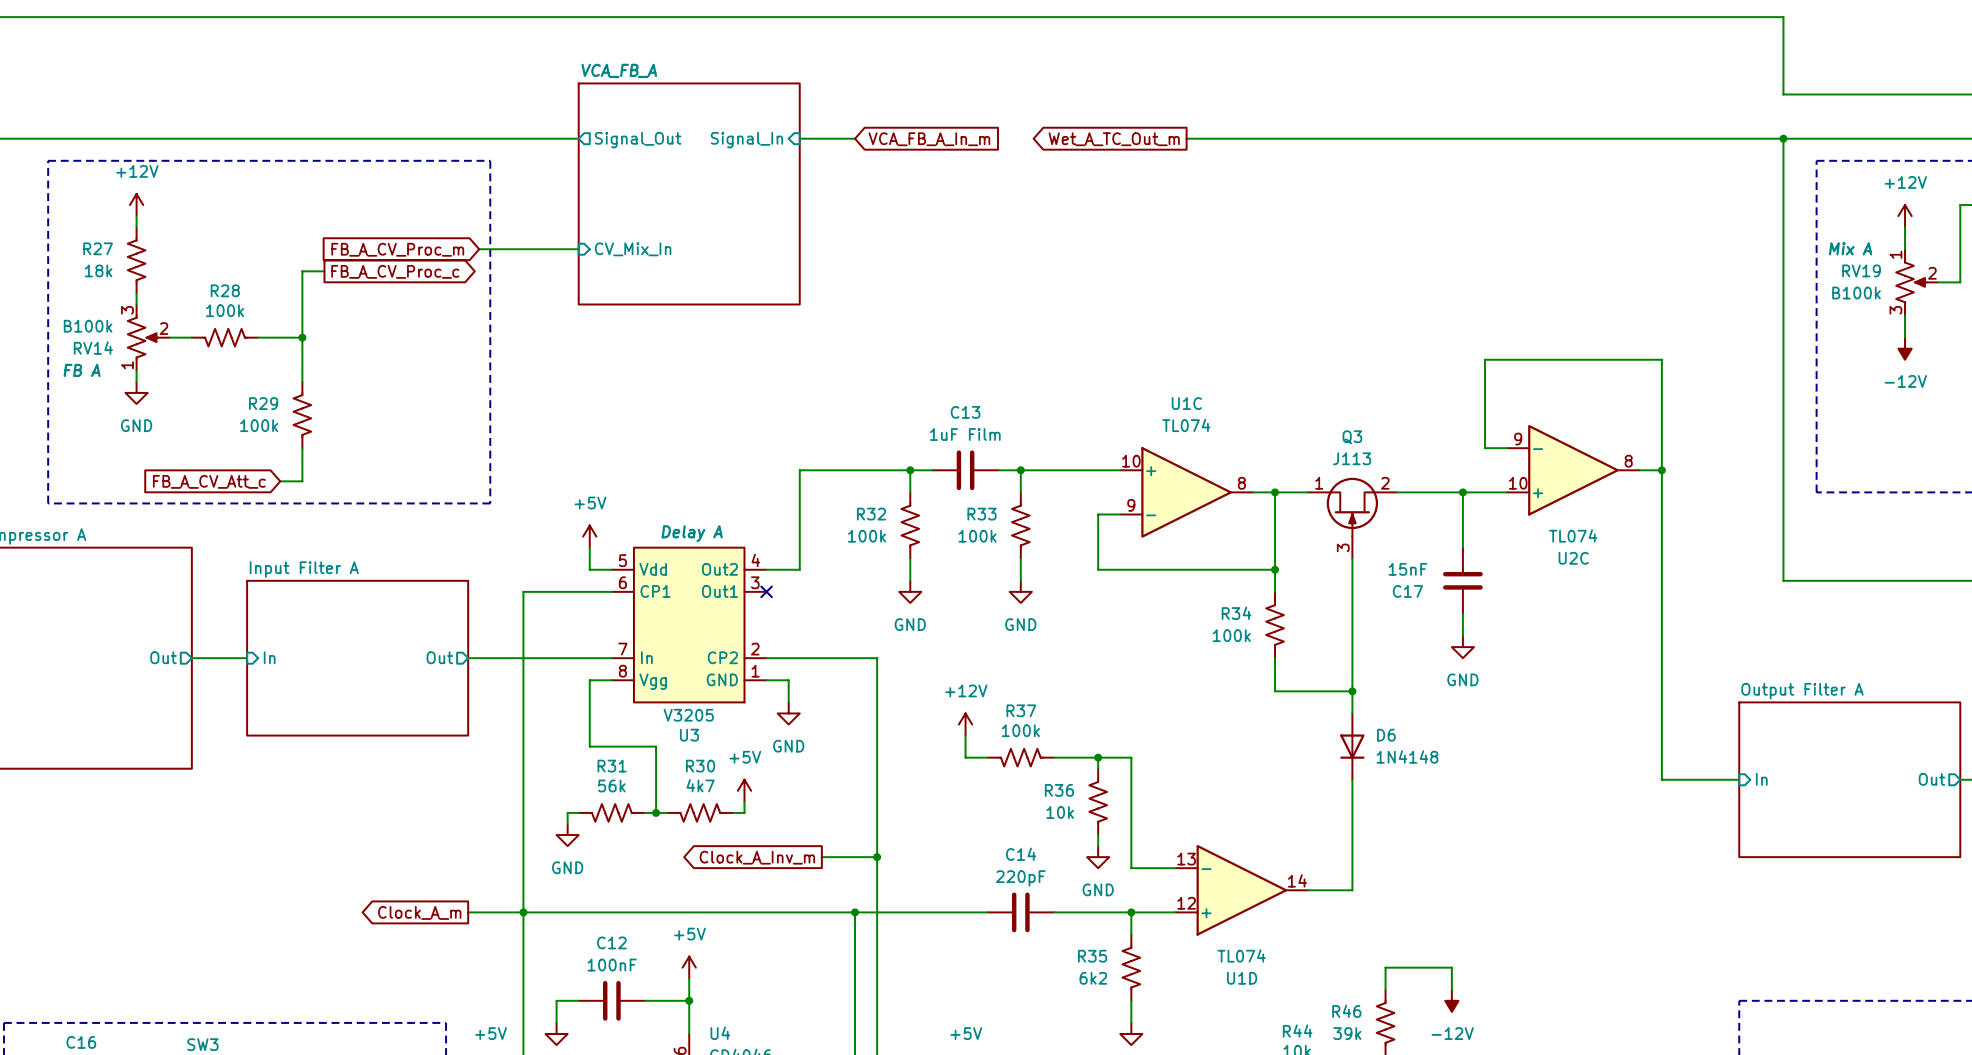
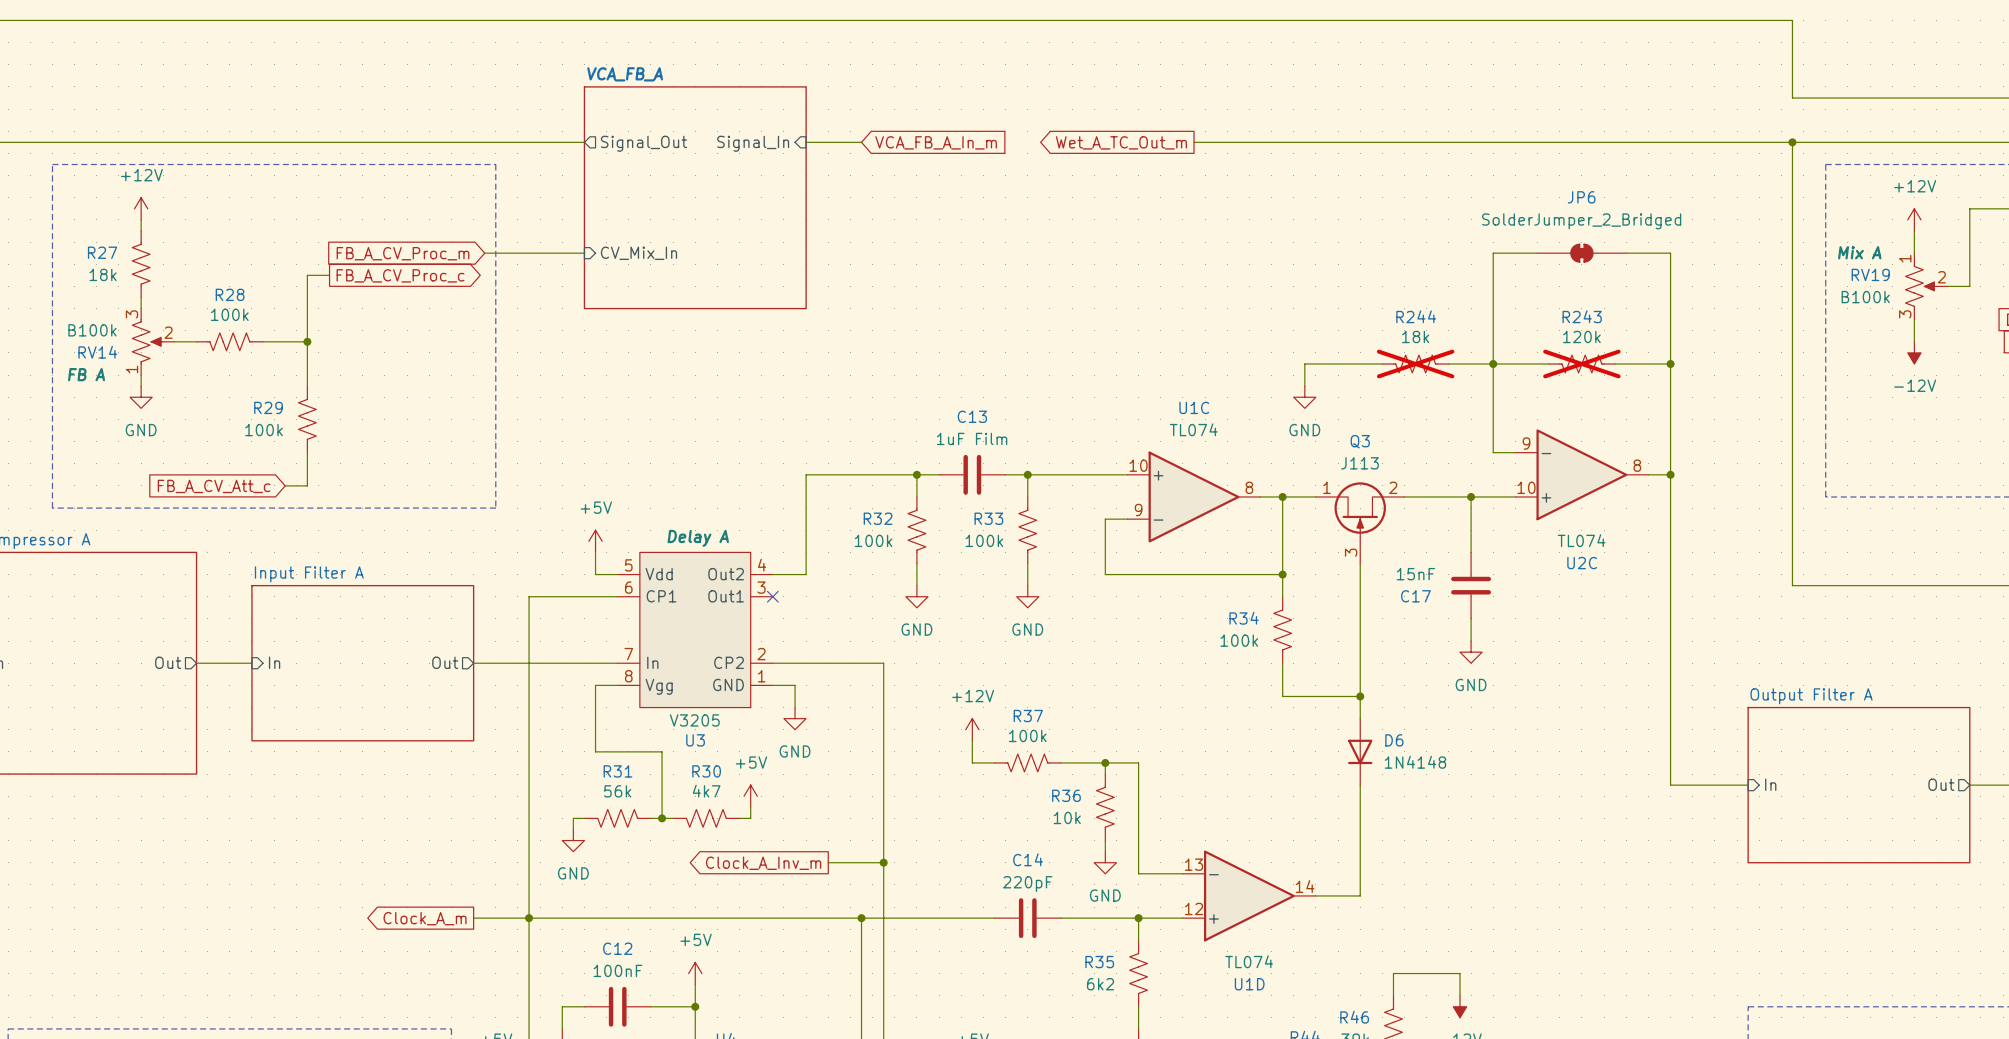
wire: none -> (1537, 253) (1493, 253) (1493, 363) (1448, 363)
JP6: none -> SolderJumper_2_Bridged (1581, 253)
wire: none -> (1626, 253) (1670, 253) (1670, 363)
wire: none -> (1382, 363) (1304, 363) (1304, 386)
R244: none -> 18k (1415, 363)
junction: none -> (1493, 363)
R243: none -> 120k (1581, 363)
junction: none -> (1670, 363)
power symbol: none -> GND (1304, 397)

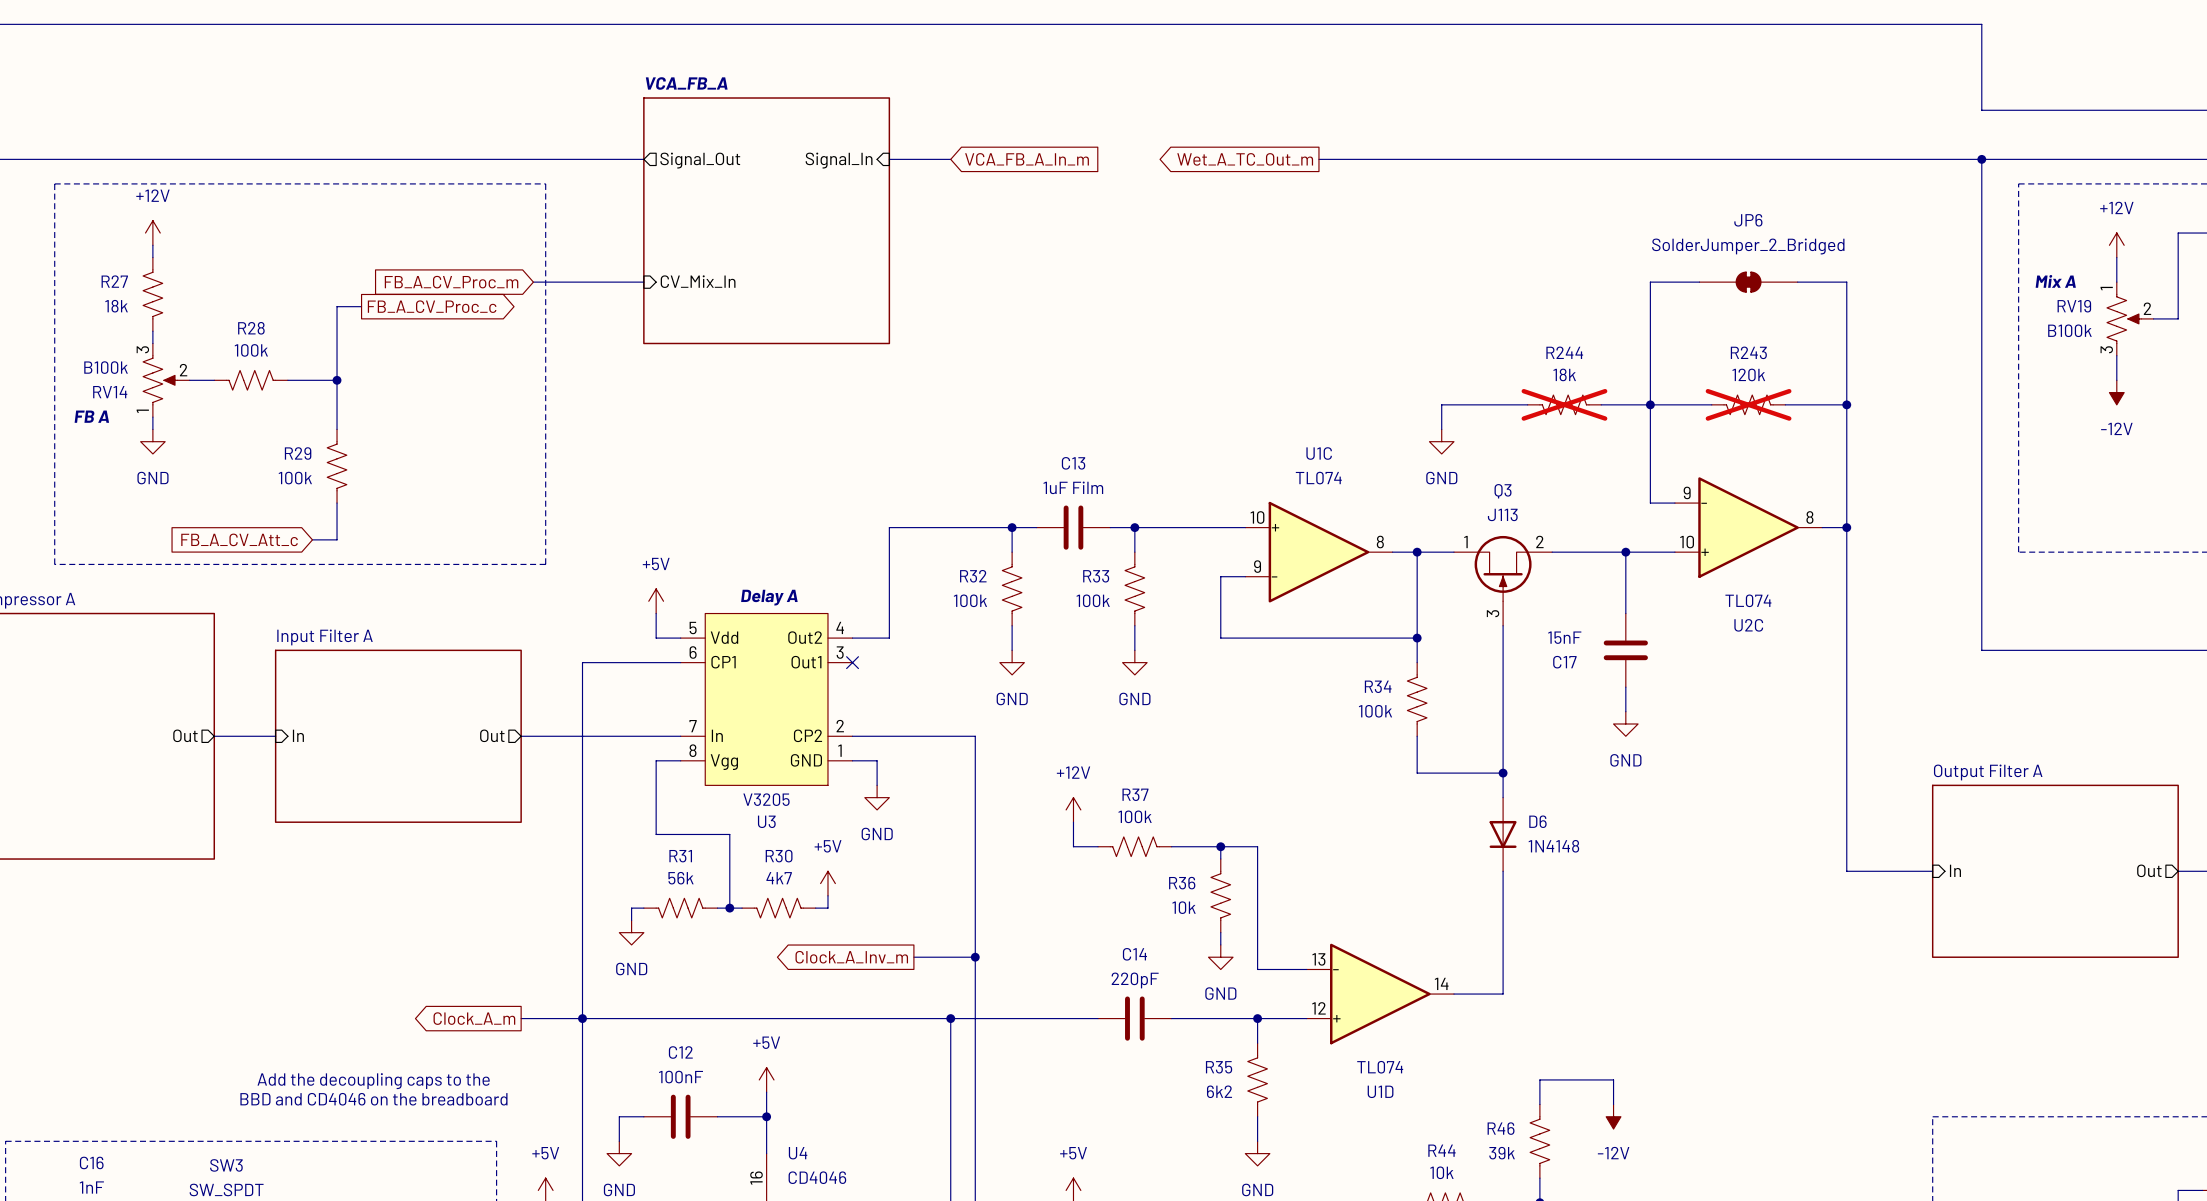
text: none -> Add the decoupling caps to the (373, 1081)
text: none -> BBD and CD4046 on the breadboard (373, 1099)

